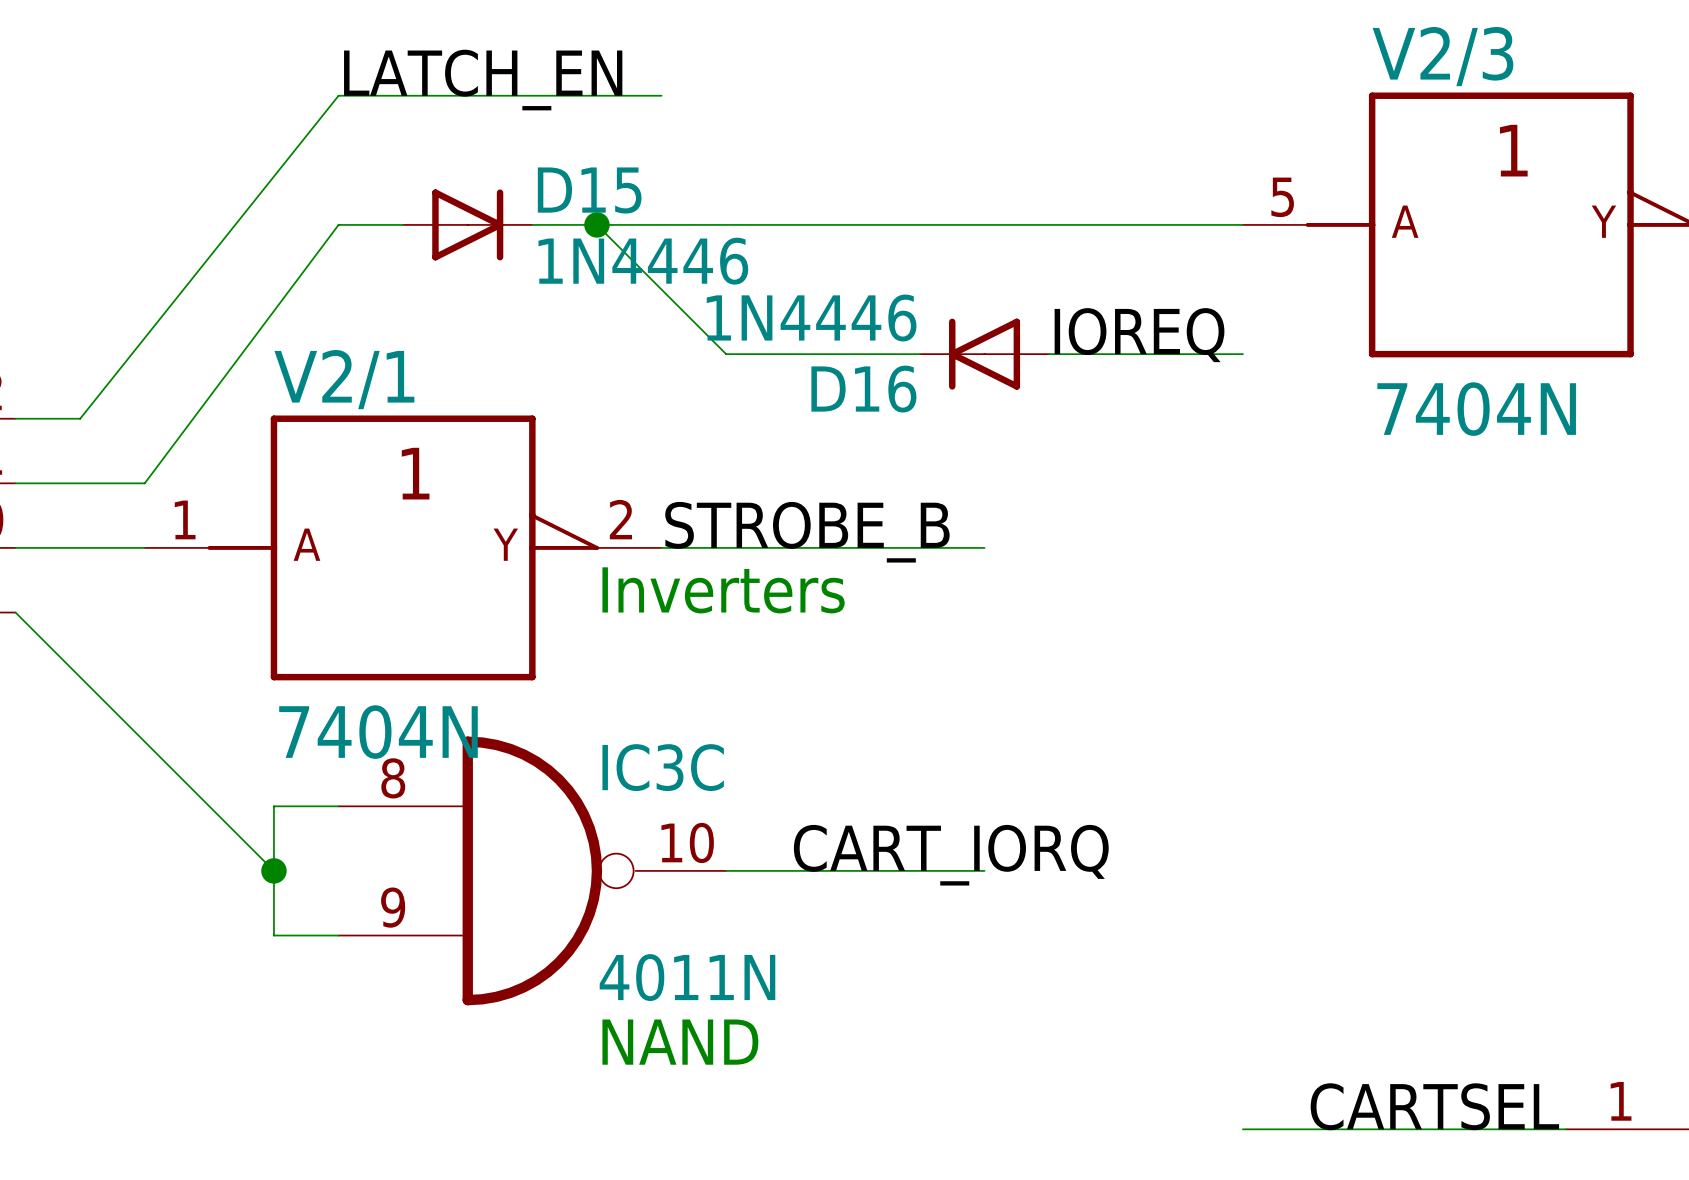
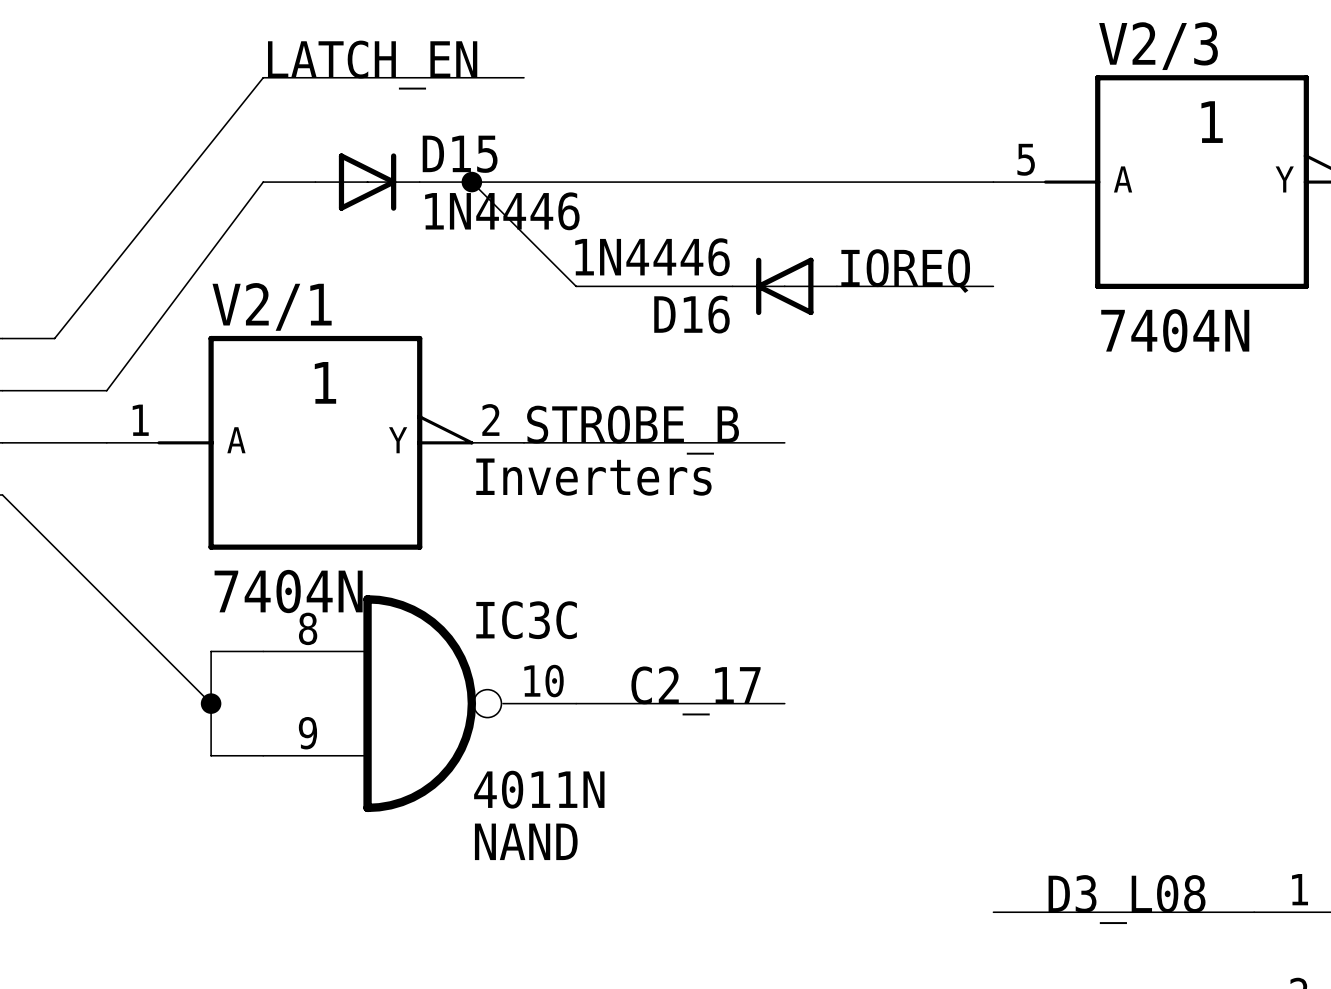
label: CART_IORQ (951, 855) -> C2_17 (696, 690)
label: CARTSEL (1434, 1106) -> D3_L08 (1127, 899)

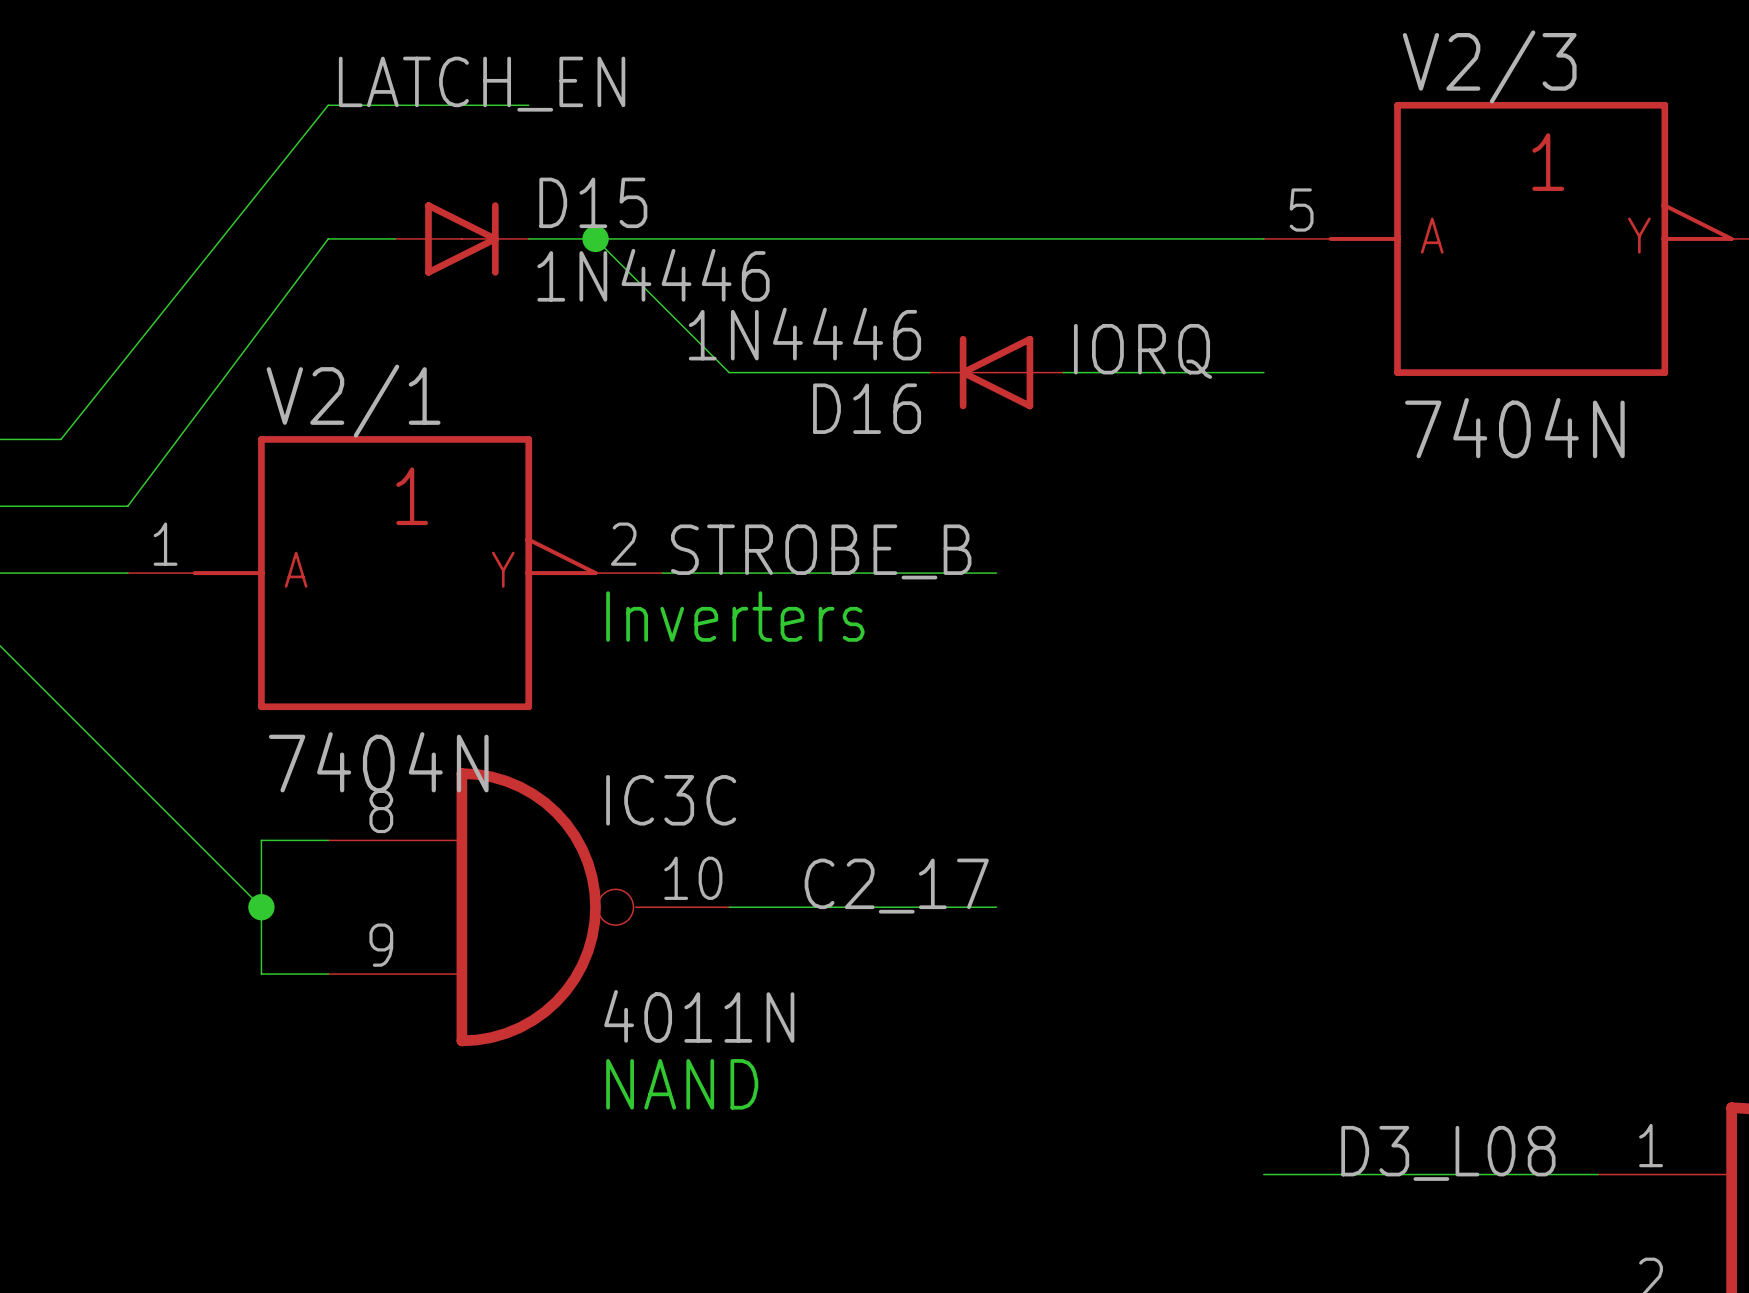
wire: (419, 77) (524, 77) -> none
label: IOREQ (905, 271) -> IORQ (1143, 351)

